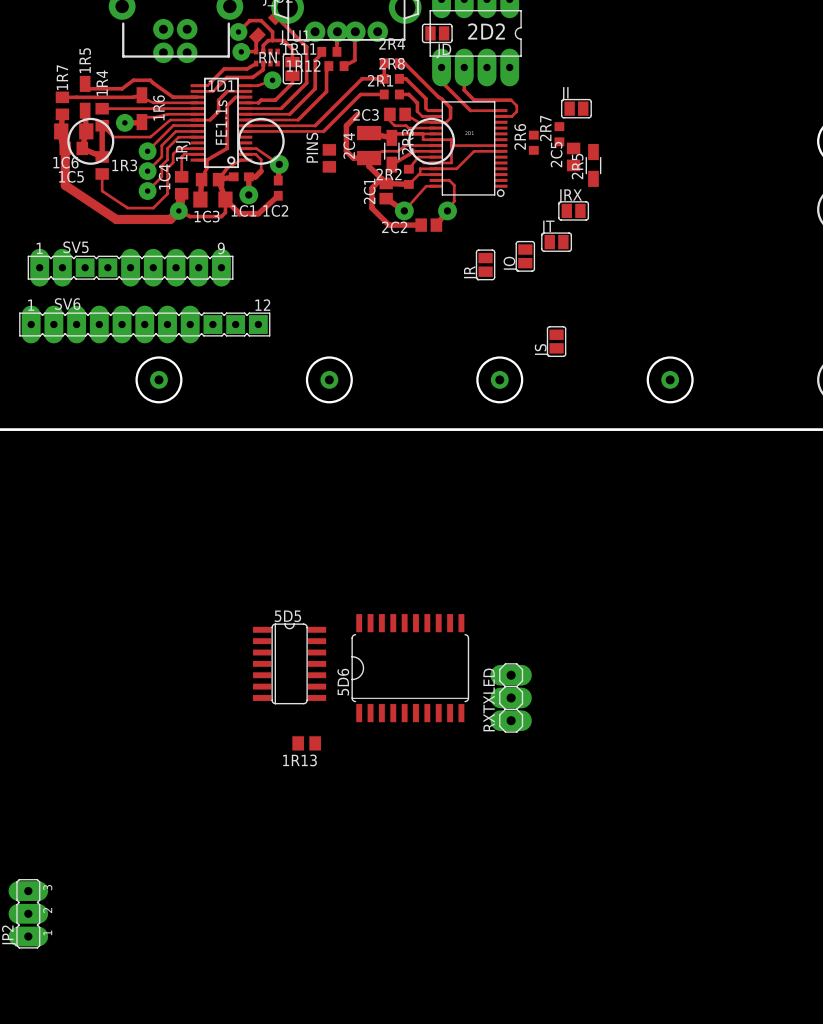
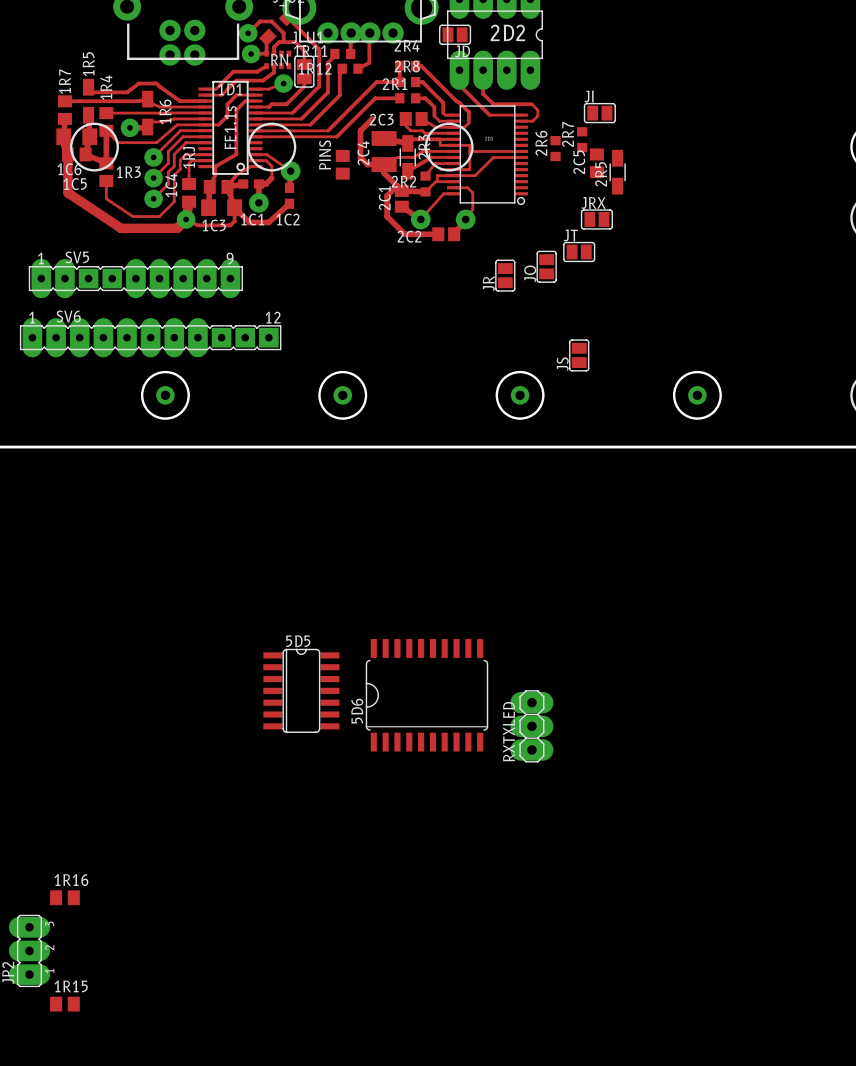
1R13: (306, 743) -> none
1R16: none -> (64, 897)
1R15: none -> (64, 1004)

